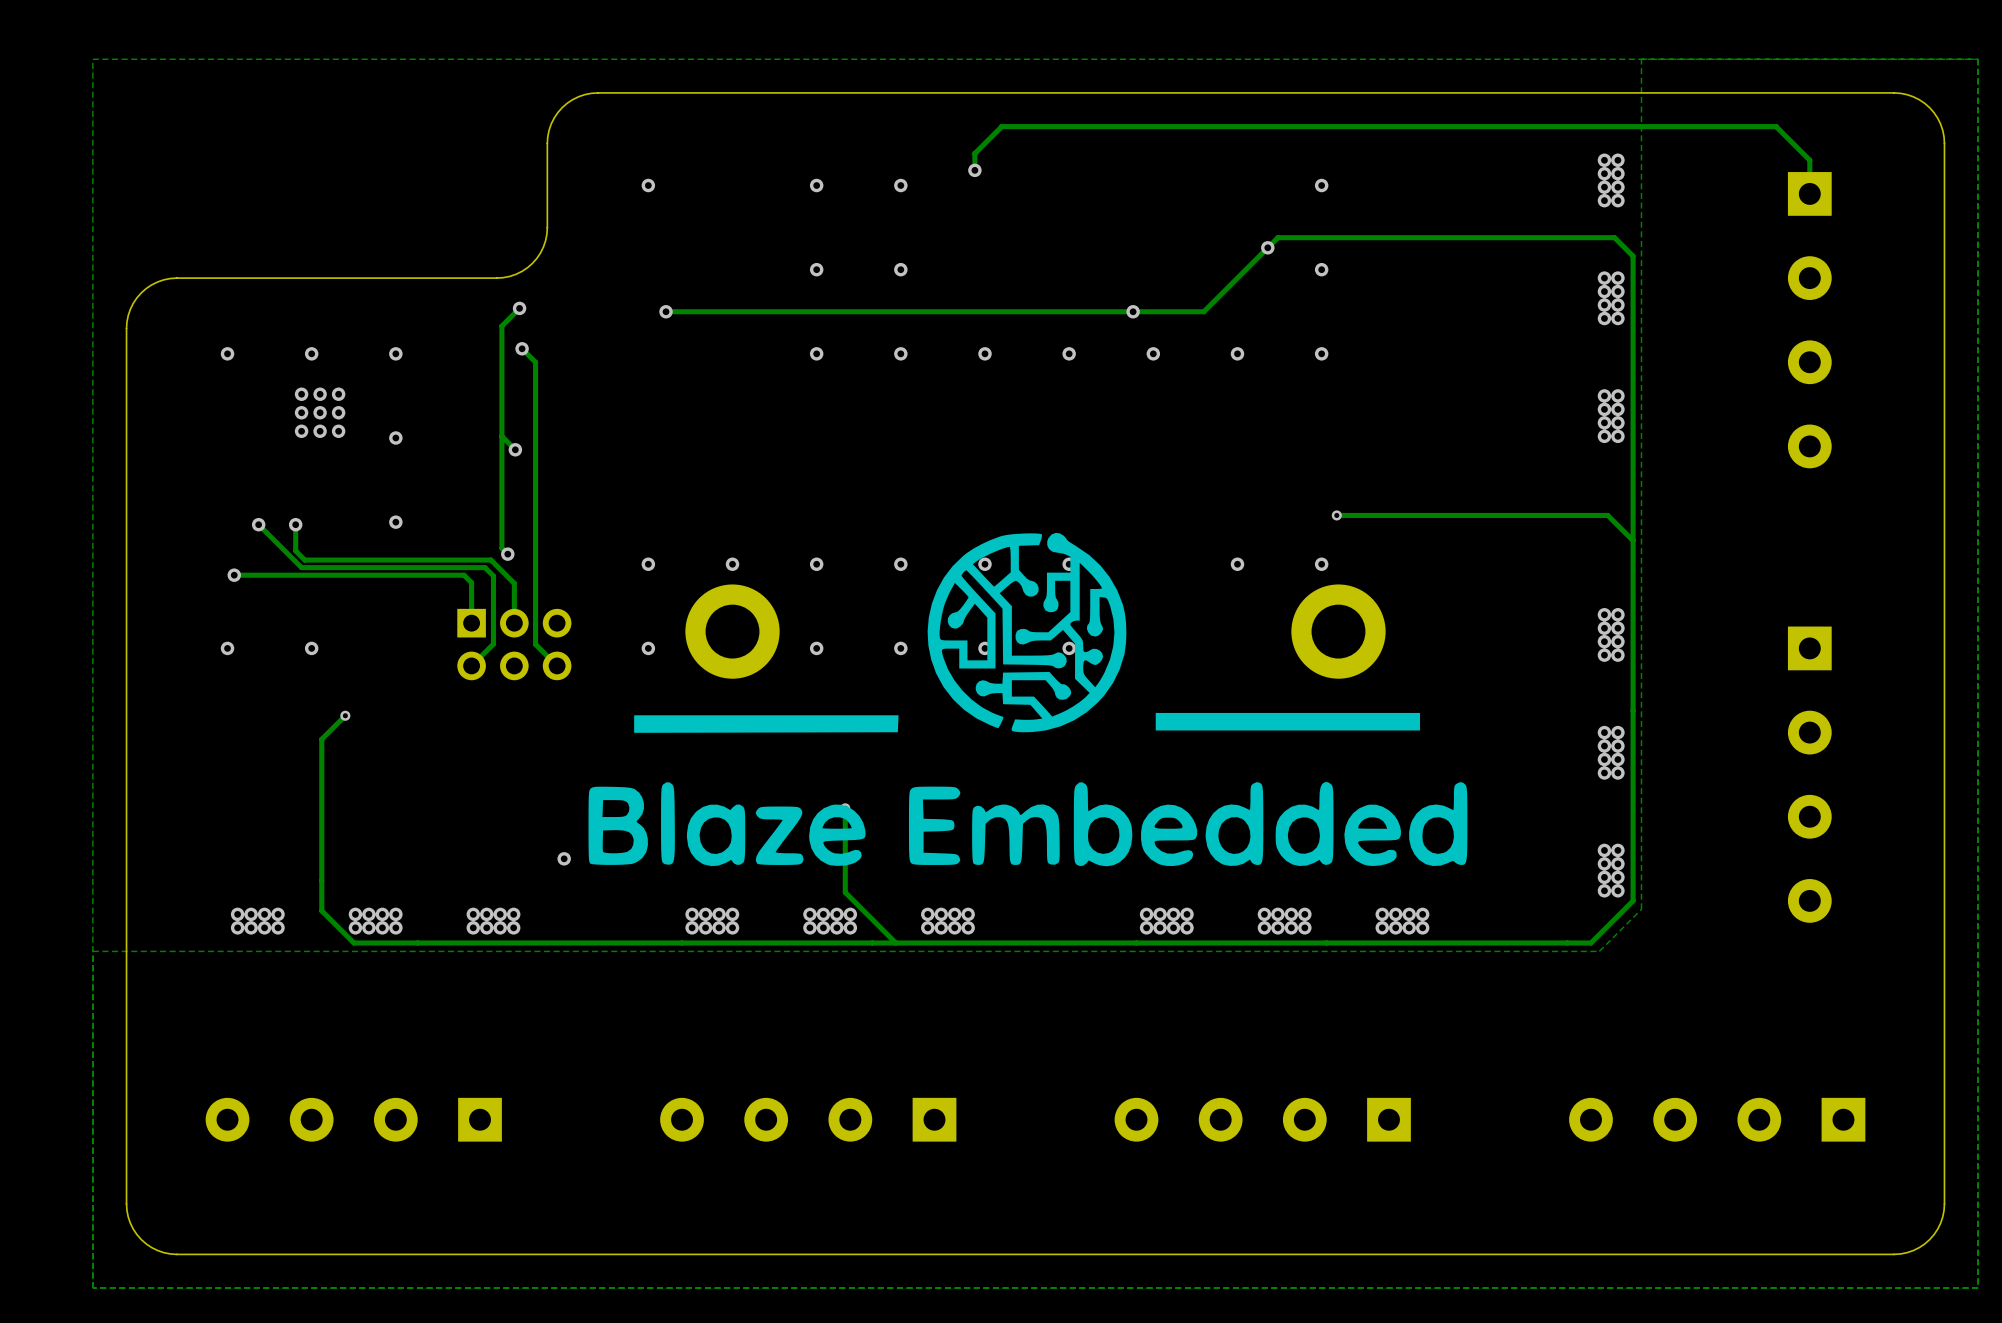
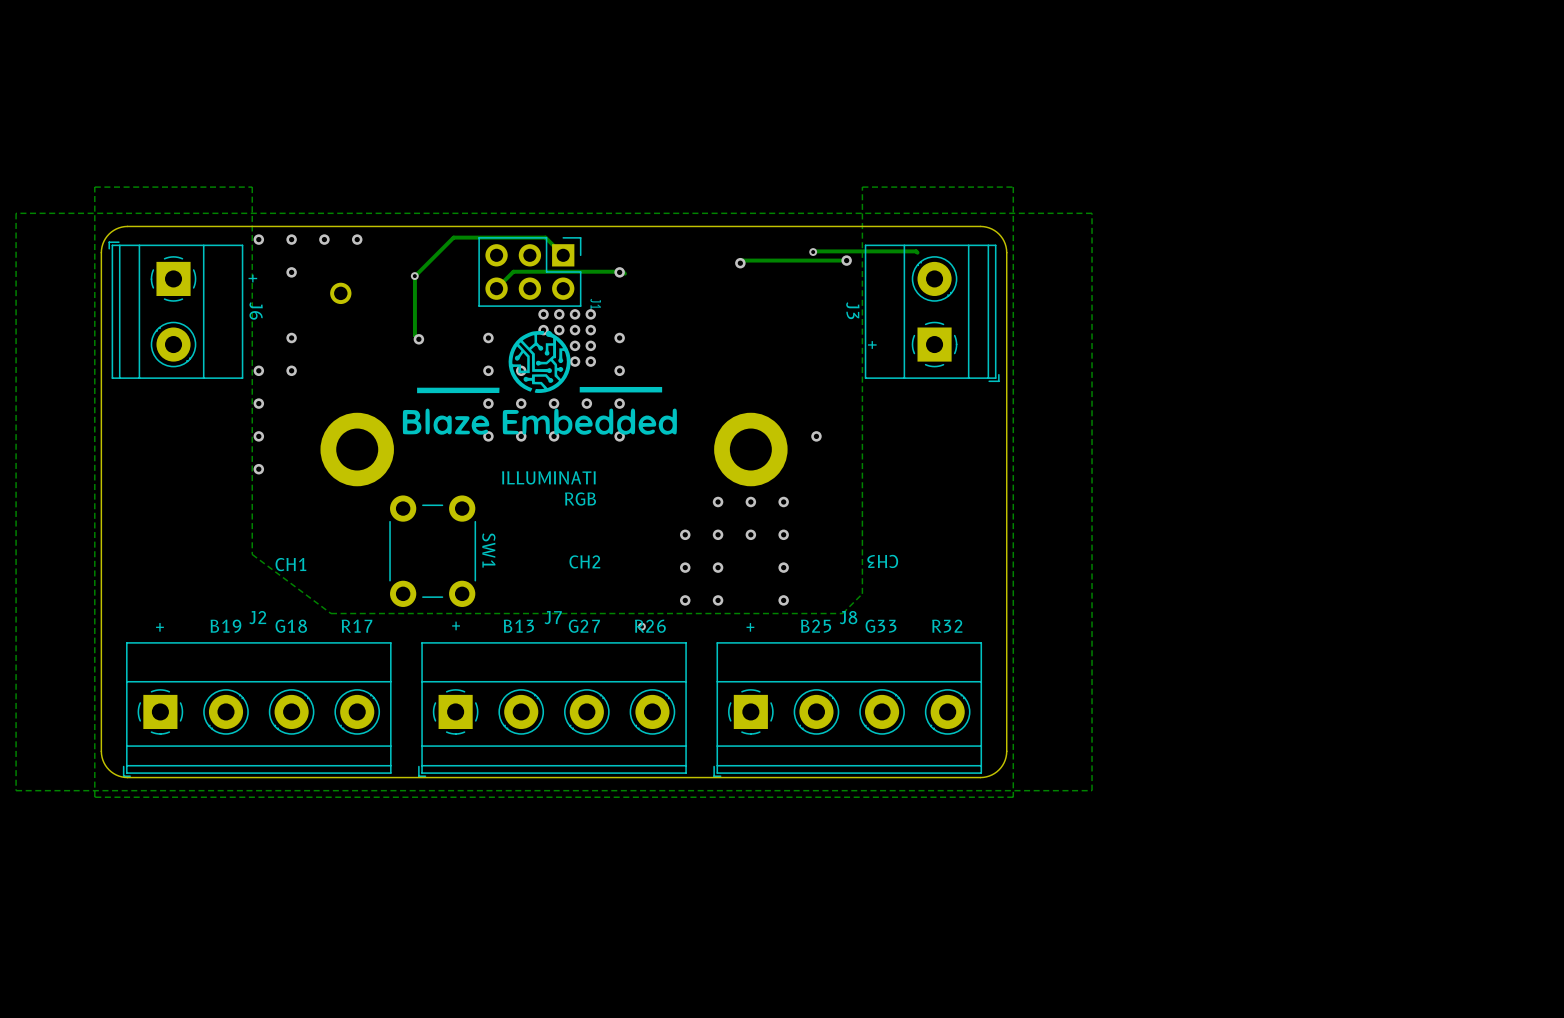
zone outline: (1641, 59) (1641, 909) (1599, 951) (92, 951) -> none
zone outline: (1978, 59) (1978, 1288) (92, 1288) (92, 59) (1978, 59) -> none
board edge: (1893, 92) (591, 93) (578, 96) (567, 103) (557, 112) (551, 124) (547, 143) (545, 240) (536, 258) (527, 267) (516, 274) (496, 278) (177, 278) (163, 279) (151, 284) (141, 292) (133, 303) (128, 315) (126, 328) (126, 1203) (128, 1216) (133, 1229) (141, 1239) (151, 1247) (163, 1252) (177, 1254) (1893, 1254) (1907, 1252) (1919, 1247) (1929, 1239) (1937, 1229) (1942, 1216) (1944, 1203) (1944, 143) (1940, 124) (1929, 107) (1913, 96) (1893, 92) -> none
via: (1604, 160) -> none
via: (1617, 160) -> none
track: (974, 170) (974, 153) (1001, 126) (1776, 126) (1809, 160) (1809, 193) -> none
via: (974, 170) -> none
via: (1604, 173) -> none
via: (1617, 173) -> none
via: (648, 185) -> none
via: (816, 185) -> none
via: (900, 185) -> none
via: (1321, 185) -> none
via: (1604, 187) -> none
via: (1617, 187) -> none
via: (1604, 200) -> none
via: (1617, 200) -> none
zone outline: none -> (1013, 187) (862, 187) (862, 593) (842, 613) (330, 613) (252, 554) (252, 187) (94, 187) (94, 797) (1013, 797) (1013, 187)
via: (1267, 247) -> none
via: (816, 269) -> none
via: (900, 269) -> none
via: (1321, 269) -> none
zone outline: none -> (1092, 213) (1092, 790) (16, 790) (16, 213) (1092, 213)
via: (1604, 278) -> none
via: (1617, 278) -> none
via: (1604, 291) -> none
via: (1617, 291) -> none
board edge: none -> (980, 226) (127, 226) (113, 230) (103, 241) (101, 252) (101, 751) (105, 765) (116, 774) (127, 777) (980, 777) (994, 773) (1004, 762) (1006, 751) (1006, 252) (1005, 244) (999, 234) (989, 227) (980, 226)
via: (1604, 305) -> none
via: (1617, 305) -> none
track: (519, 308) (501, 326) (501, 548) (507, 554) -> none
via: (519, 308) -> none
via: none -> (258, 239)
via: none -> (291, 239)
via: none -> (324, 239)
via: none -> (357, 239)
track: (666, 311) (1203, 311) (1277, 237) (1614, 237) (1633, 256) (1633, 900) (1590, 942) (353, 942) (321, 910) (321, 739) (345, 715) -> none
via: (666, 311) -> none
via: (1133, 311) -> none
via: (1604, 318) -> none
via: (1617, 318) -> none
part: (1809, 320) -> none
track: none -> (813, 252) (917, 252)
via: none -> (813, 252)
track: none -> (563, 255) (545, 237) (453, 237) (414, 276)
track: none -> (846, 260) (742, 260) (740, 263)
via: none -> (846, 260)
track: (522, 348) (535, 362) (535, 644) (557, 665) -> none
via: (522, 348) -> none
via: (227, 353) -> none
via: (311, 353) -> none
via: (900, 353) -> none
via position: (985, 353) -> (740, 263)
via: (1069, 353) -> none
via: (1153, 353) -> none
via: (1237, 353) -> none
via: (1321, 353) -> none
track: none -> (624, 273) (622, 271) (513, 271) (496, 288)
via: none -> (414, 276)
track: none -> (414, 276) (414, 335) (418, 339)
text: none -> + (252, 278)
part: none -> (340, 293)
via: (301, 394) -> none
via: (320, 394) -> none
via: (338, 394) -> none
via: (1604, 395) -> none
via: (1617, 395) -> none
J6: none -> (175, 310)
J3: none -> (932, 313)
via: none -> (543, 314)
via: none -> (559, 314)
via: none -> (575, 314)
via: none -> (590, 314)
via: (1604, 409) -> none
via: (1617, 409) -> none
via: (301, 412) -> none
via: (320, 412) -> none
via: (338, 412) -> none
via: (1604, 422) -> none
via: (1617, 422) -> none
via: none -> (543, 330)
via: none -> (559, 330)
via: none -> (575, 330)
via: none -> (590, 330)
drawing: none -> [402, 330, 677, 435]
via: (301, 431) -> none
via: (320, 431) -> none
via: (338, 431) -> none
track: (501, 436) (515, 449) -> none
via: (1604, 436) -> none
via: (1617, 436) -> none
via: none -> (488, 337)
via: none -> (619, 337)
text: none -> + (872, 344)
via: none -> (575, 345)
via: none -> (590, 345)
via position: (515, 449) -> (418, 339)
via: none -> (575, 361)
via: none -> (590, 361)
via: none -> (258, 370)
via: none -> (291, 370)
via: none -> (488, 370)
via: none -> (521, 370)
via: none -> (619, 370)
track: (1336, 515) (1607, 515) (1633, 540) -> none
via: (1336, 515) -> none
via: none -> (258, 403)
via: (395, 522) -> none
via: none -> (488, 403)
via: none -> (521, 403)
via: none -> (554, 403)
via: none -> (586, 403)
via: none -> (619, 403)
track: (258, 524) (301, 567) (485, 567) (493, 576) (493, 644) (471, 665) -> none
via: (258, 524) -> none
track: (295, 524) (295, 551) (304, 560) (490, 560) (514, 583) (514, 623) -> none
via: (295, 524) -> none
drawing: [588, 532, 1468, 867] -> none
via: (507, 554) -> none
via: none -> (258, 436)
via: none -> (521, 436)
via: (900, 564) -> none
via: (985, 564) -> none
via: (1237, 564) -> none
via: (1321, 564) -> none
track: (234, 575) (464, 575) (471, 582) (471, 623) -> none
via: (234, 575) -> none
part: none -> (357, 449)
part: none -> (750, 449)
via: none -> (258, 469)
via: (1604, 614) -> none
via: (1617, 614) -> none
text: none -> ILLUMINATI (548, 477)
via: (1604, 628) -> none
via: (1617, 628) -> none
part: (732, 631) -> none
part: (1338, 631) -> none
via: (1604, 641) -> none
via: (1617, 641) -> none
J1 side: top (514, 644) -> bottom (529, 271)
text: none -> RGB (580, 499)
via: (227, 648) -> none
via: (311, 648) -> none
via: (648, 648) -> none
via: (816, 648) -> none
via: (900, 648) -> none
via: none -> (718, 502)
via: none -> (783, 502)
via: (1069, 648) -> none
via: (1604, 655) -> none
via: (1617, 655) -> none
via: none -> (685, 534)
via: none -> (718, 534)
via: none -> (750, 534)
via: none -> (783, 534)
SW1: none -> (432, 551)
via: (345, 715) -> none
text: none -> CH3 (882, 561)
text: none -> CH2 (584, 561)
text: none -> CH1 (290, 564)
via: none -> (685, 567)
via: none -> (718, 567)
via: none -> (783, 567)
via: (1604, 732) -> none
via: (1617, 732) -> none
via: (1604, 746) -> none
via: (1617, 746) -> none
via: (1604, 759) -> none
via: (1617, 759) -> none
via: (1604, 772) -> none
via: (1617, 772) -> none
via: none -> (685, 600)
via: none -> (718, 600)
via: none -> (783, 600)
part: (1809, 774) -> none
text: none -> B19 (225, 626)
text: none -> G18 (291, 626)
text: none -> R17 (357, 626)
text: none -> + (456, 625)
text: none -> B13 (518, 626)
text: none -> G27 (584, 626)
text: none -> R26 (650, 626)
text: none -> B25 (816, 626)
text: none -> G33 (880, 626)
text: none -> R32 (947, 626)
track: (845, 808) (845, 892) (895, 942) -> none
text: none -> + (159, 627)
text: none -> + (750, 627)
via: (1604, 850) -> none
via: (1617, 850) -> none
via: (564, 858) -> none
via: (1604, 863) -> none
via: (1617, 863) -> none
via: (1604, 877) -> none
via: (1617, 877) -> none
via: (1604, 890) -> none
via: (1617, 890) -> none
via: (237, 914) -> none
via: (251, 914) -> none
via: (264, 914) -> none
via: (278, 914) -> none
J2: none -> (257, 709)
via: (355, 914) -> none
via: (368, 914) -> none
via: (382, 914) -> none
via: (395, 914) -> none
via: (473, 914) -> none
via: (486, 914) -> none
via: (500, 914) -> none
via: (513, 914) -> none
via: (692, 914) -> none
via: (705, 914) -> none
via: (719, 914) -> none
J7: none -> (552, 709)
via: (732, 914) -> none
via: (809, 914) -> none
via: (823, 914) -> none
via: (836, 914) -> none
via: (850, 914) -> none
via: (927, 914) -> none
via: (941, 914) -> none
via: (954, 914) -> none
via: (968, 914) -> none
J8: none -> (847, 709)
via: (1146, 914) -> none
via: (1160, 914) -> none
via: (1173, 914) -> none
via: (1186, 914) -> none
via: (1264, 914) -> none
via: (1277, 914) -> none
via: (1291, 914) -> none
via: (1304, 914) -> none
via: (1382, 914) -> none
via: (1395, 914) -> none
via: (1409, 914) -> none
via: (1422, 914) -> none
via: (237, 927) -> none
via: (251, 927) -> none
via: (264, 927) -> none
via: (278, 927) -> none
via: (355, 927) -> none
via: (368, 927) -> none
via: (382, 927) -> none
via: (395, 927) -> none
via: (473, 927) -> none
via: (486, 927) -> none
via: (500, 927) -> none
via: (513, 927) -> none
via: (692, 927) -> none
via: (705, 927) -> none
via: (719, 927) -> none
via: (732, 927) -> none
via: (809, 927) -> none
via: (823, 927) -> none
via: (836, 927) -> none
via: (850, 927) -> none
via: (927, 927) -> none
via: (941, 927) -> none
via: (954, 927) -> none
via: (968, 927) -> none
via: (1146, 927) -> none
via: (1160, 927) -> none
via: (1173, 927) -> none
via: (1186, 927) -> none
via: (1264, 927) -> none
via: (1277, 927) -> none
via: (1291, 927) -> none
via: (1304, 927) -> none
via: (1382, 927) -> none
via: (1395, 927) -> none
via: (1409, 927) -> none
via: (1422, 927) -> none
part: (353, 1119) -> none
part: (808, 1119) -> none
part: (1262, 1119) -> none
part: (1717, 1119) -> none

